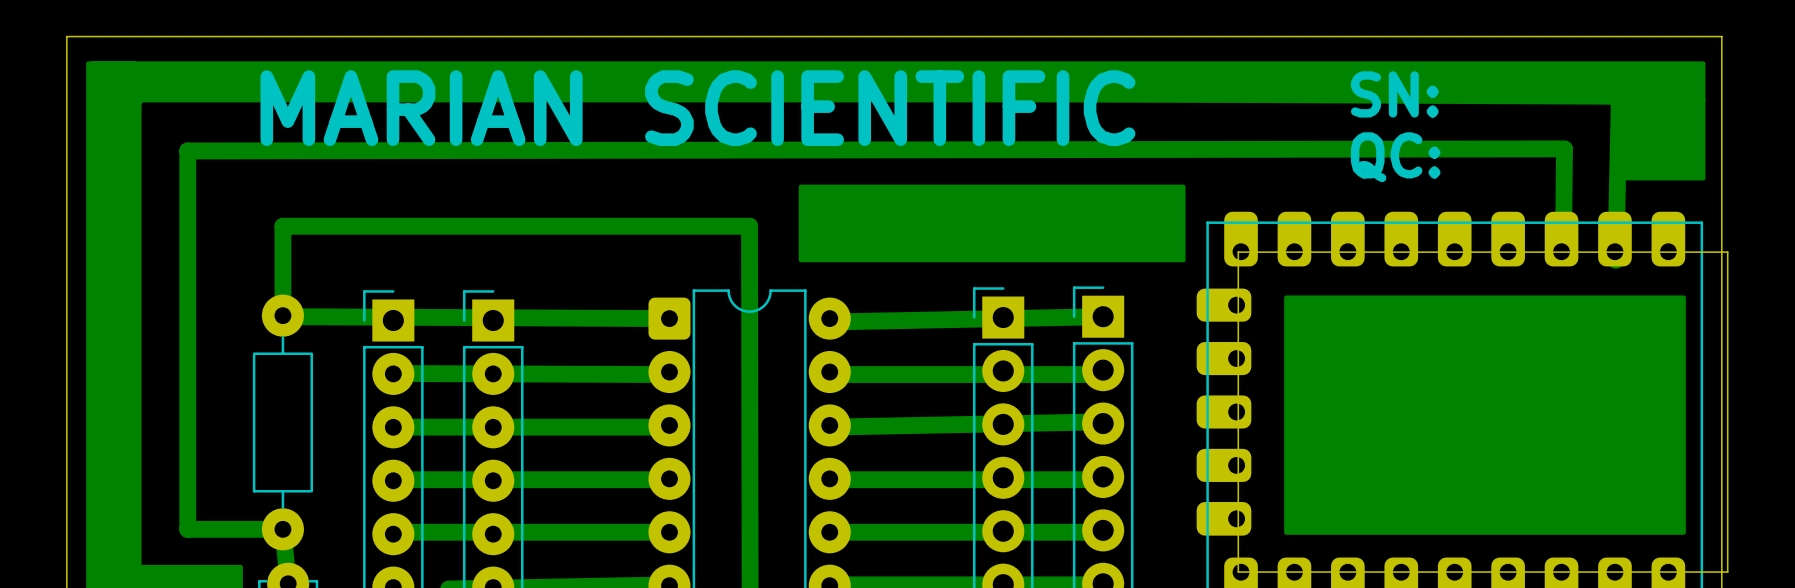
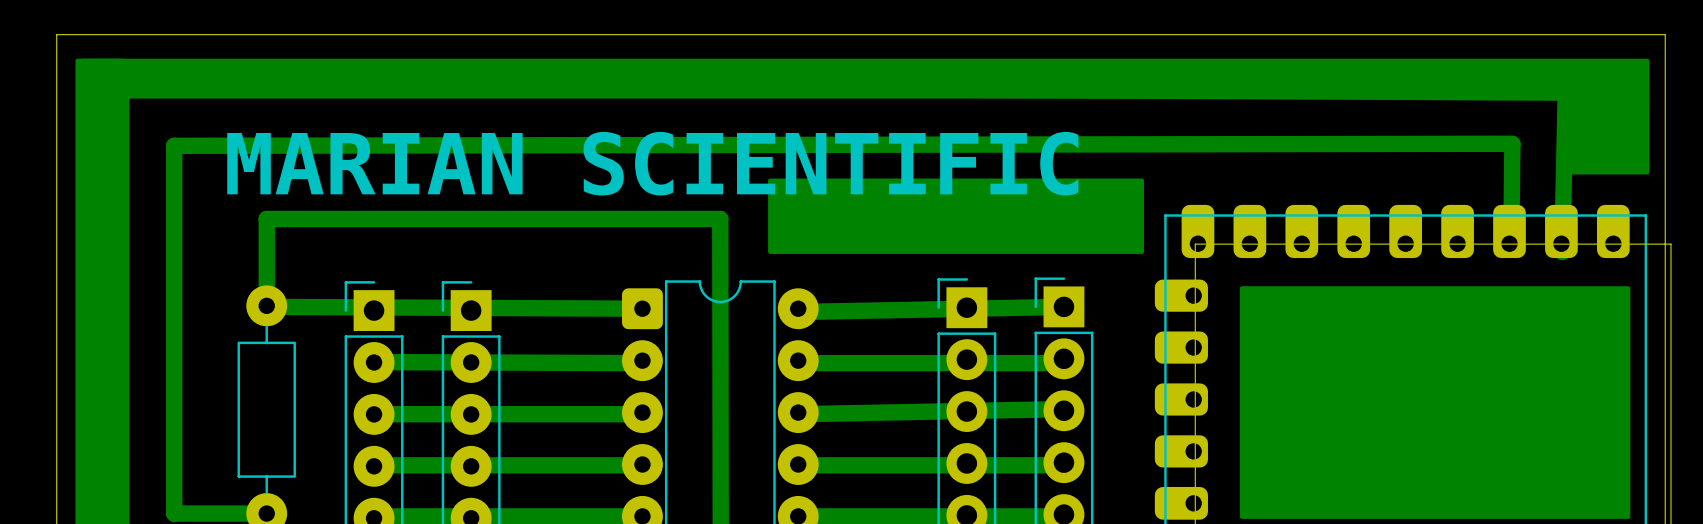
text: SN: (1394, 94) -> none
text position: MARIAN SCIENTIFIC (697, 108) -> MARIAN SCIENTIFIC (652, 163)
text: QC: (1395, 157) -> none

